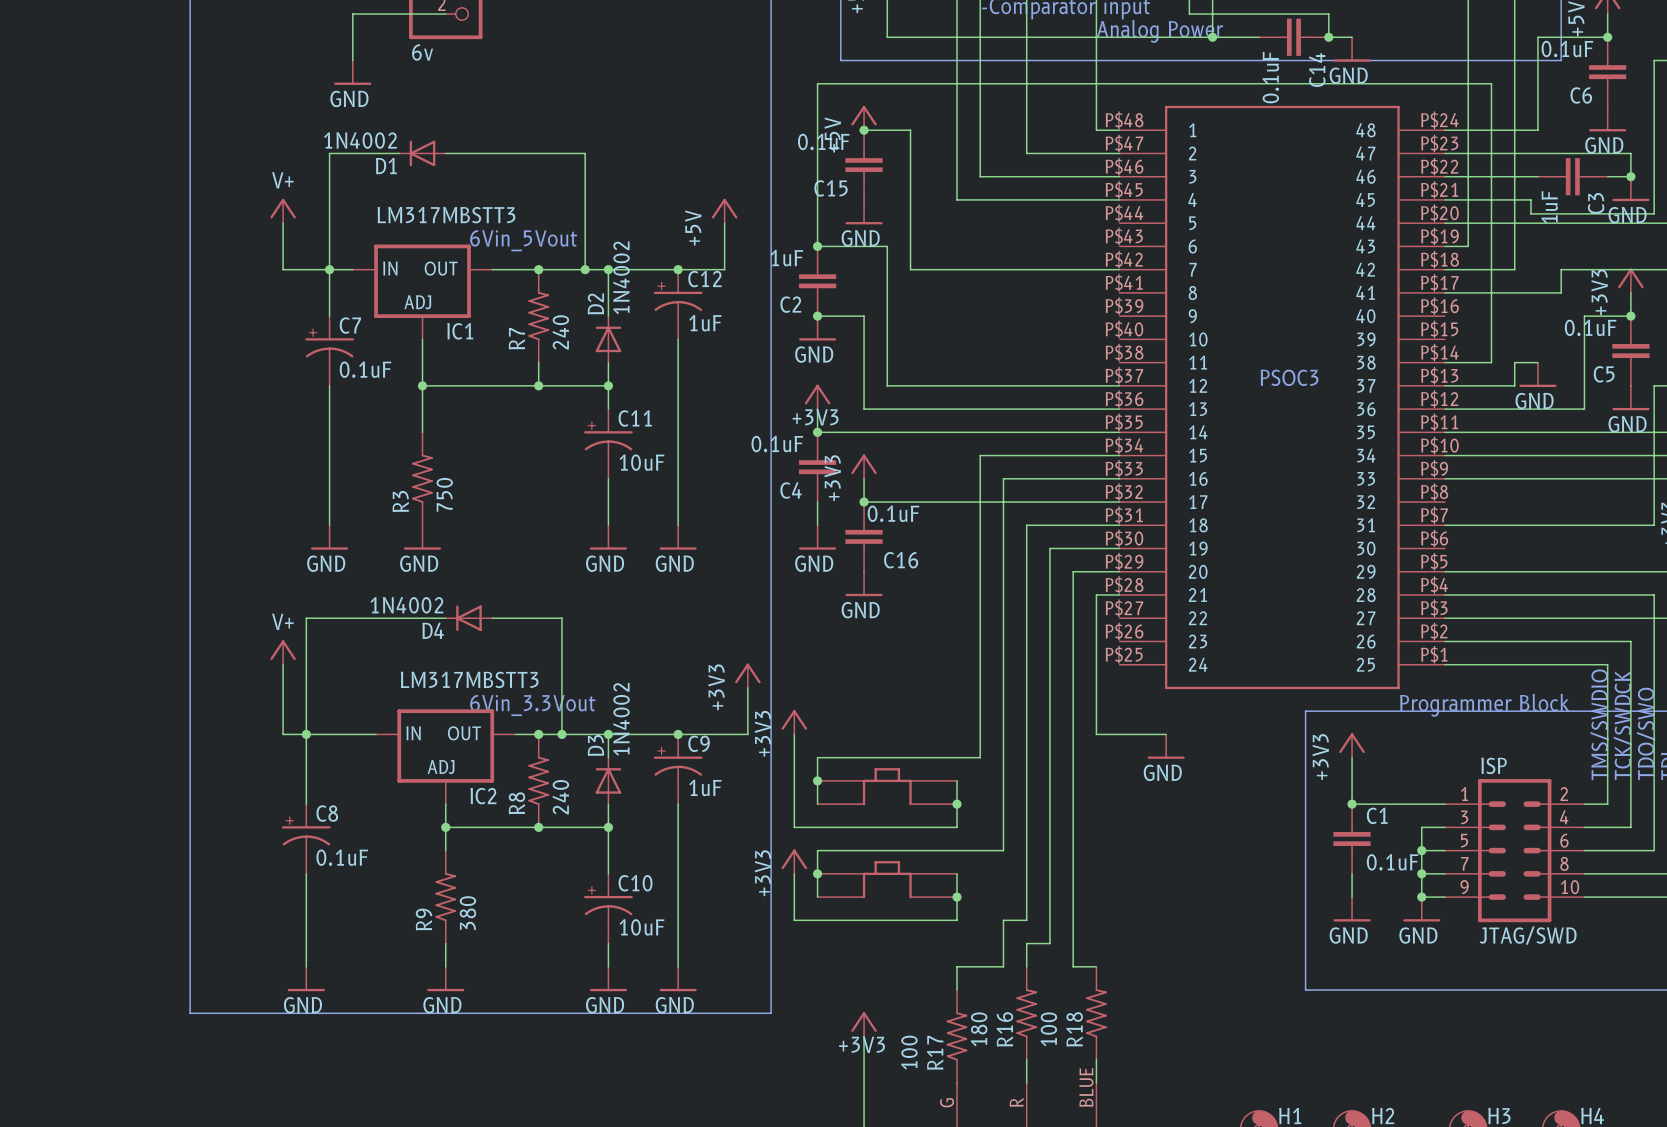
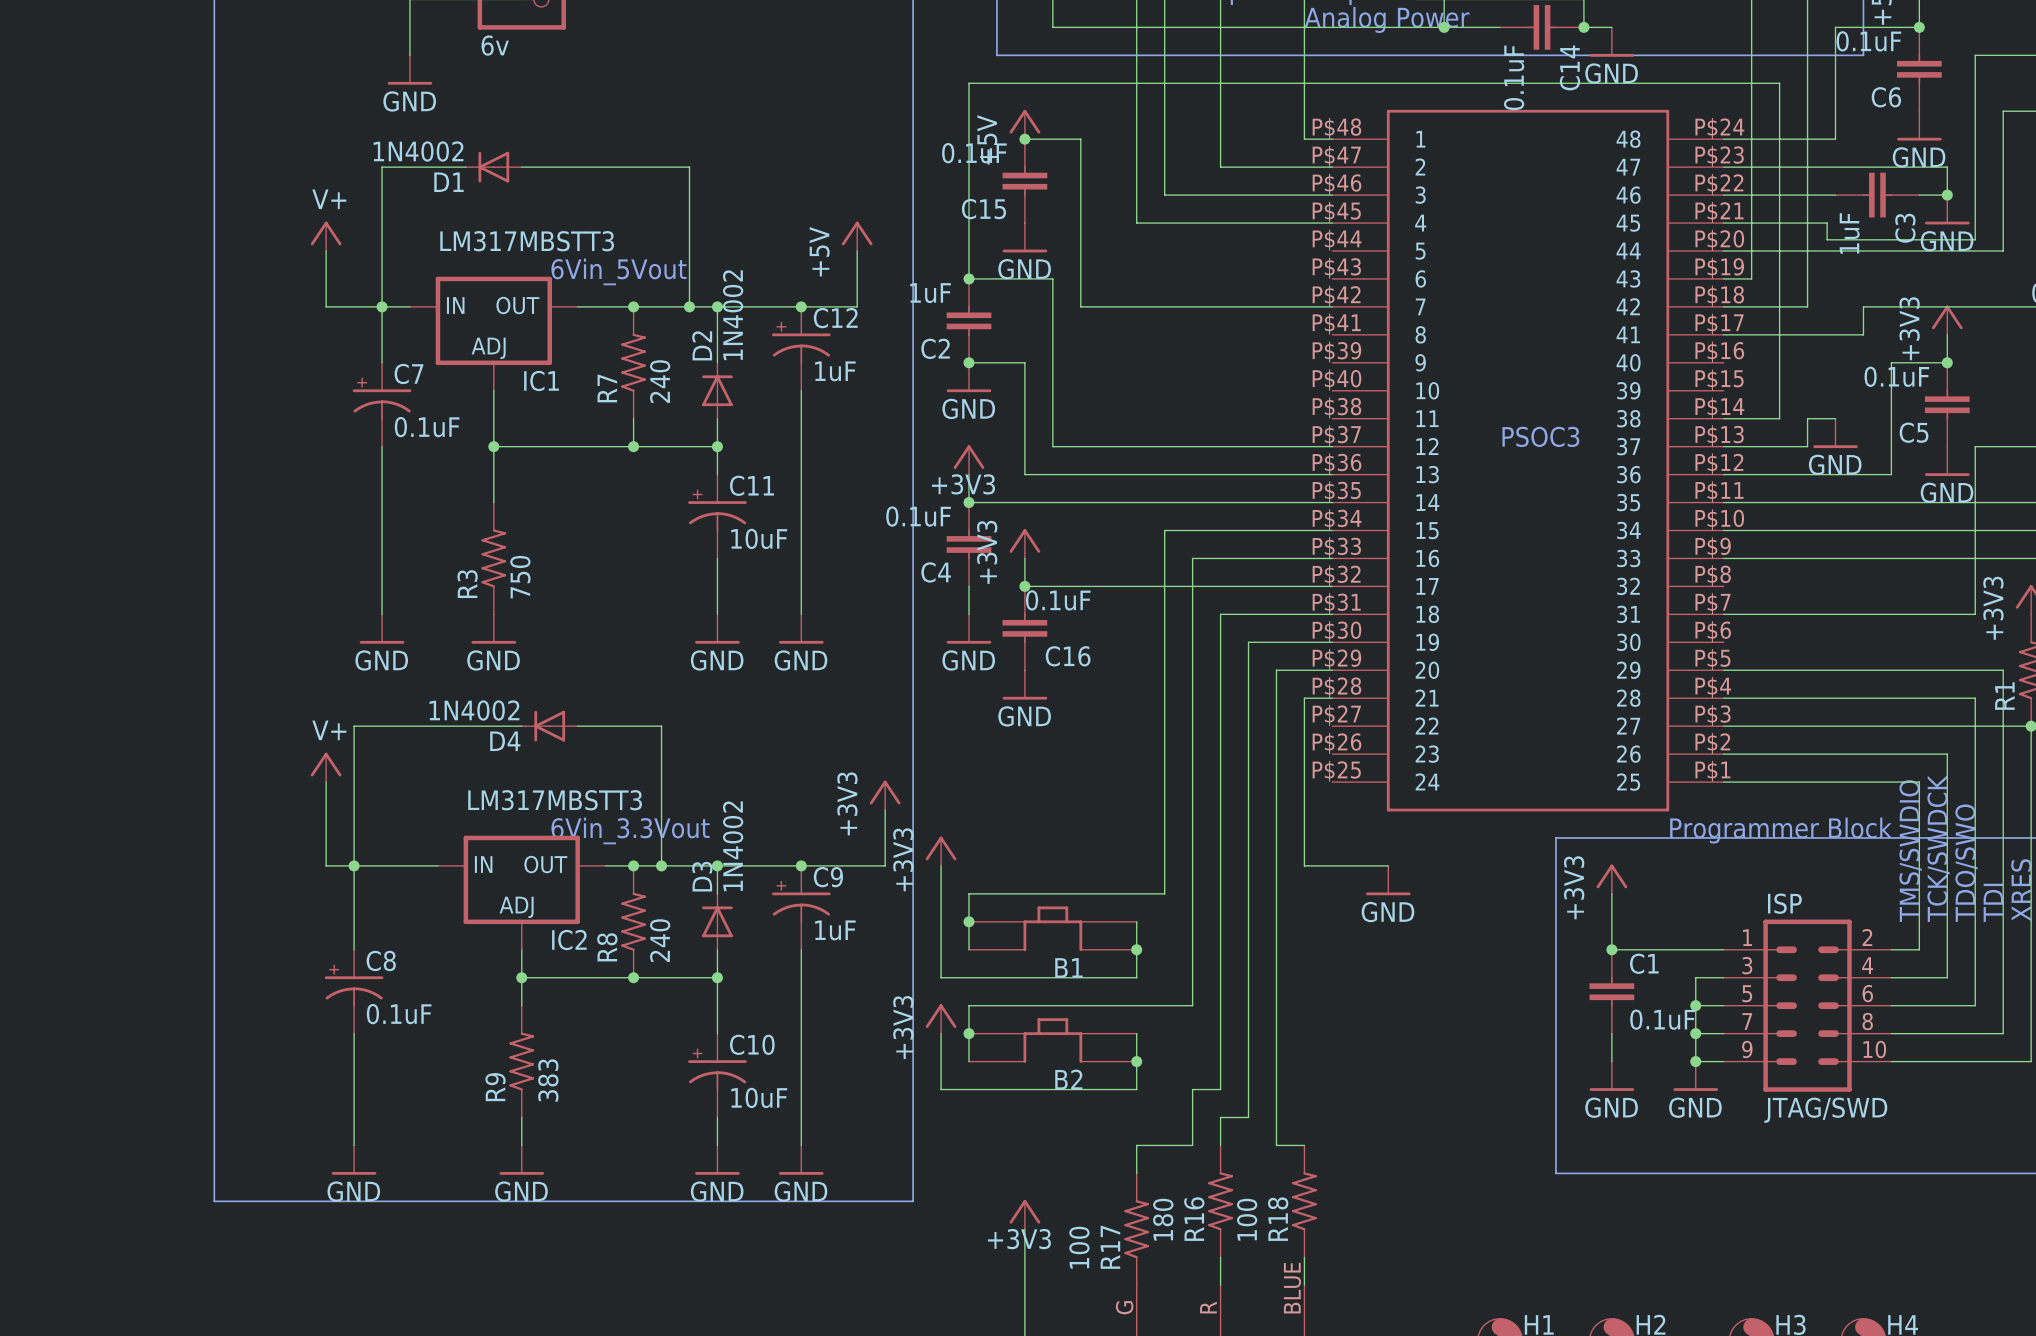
text: none -> B1 (1068, 967)
text: none -> B2 (1068, 1079)
R9 value: 380 (467, 913) -> 383 (548, 1080)

